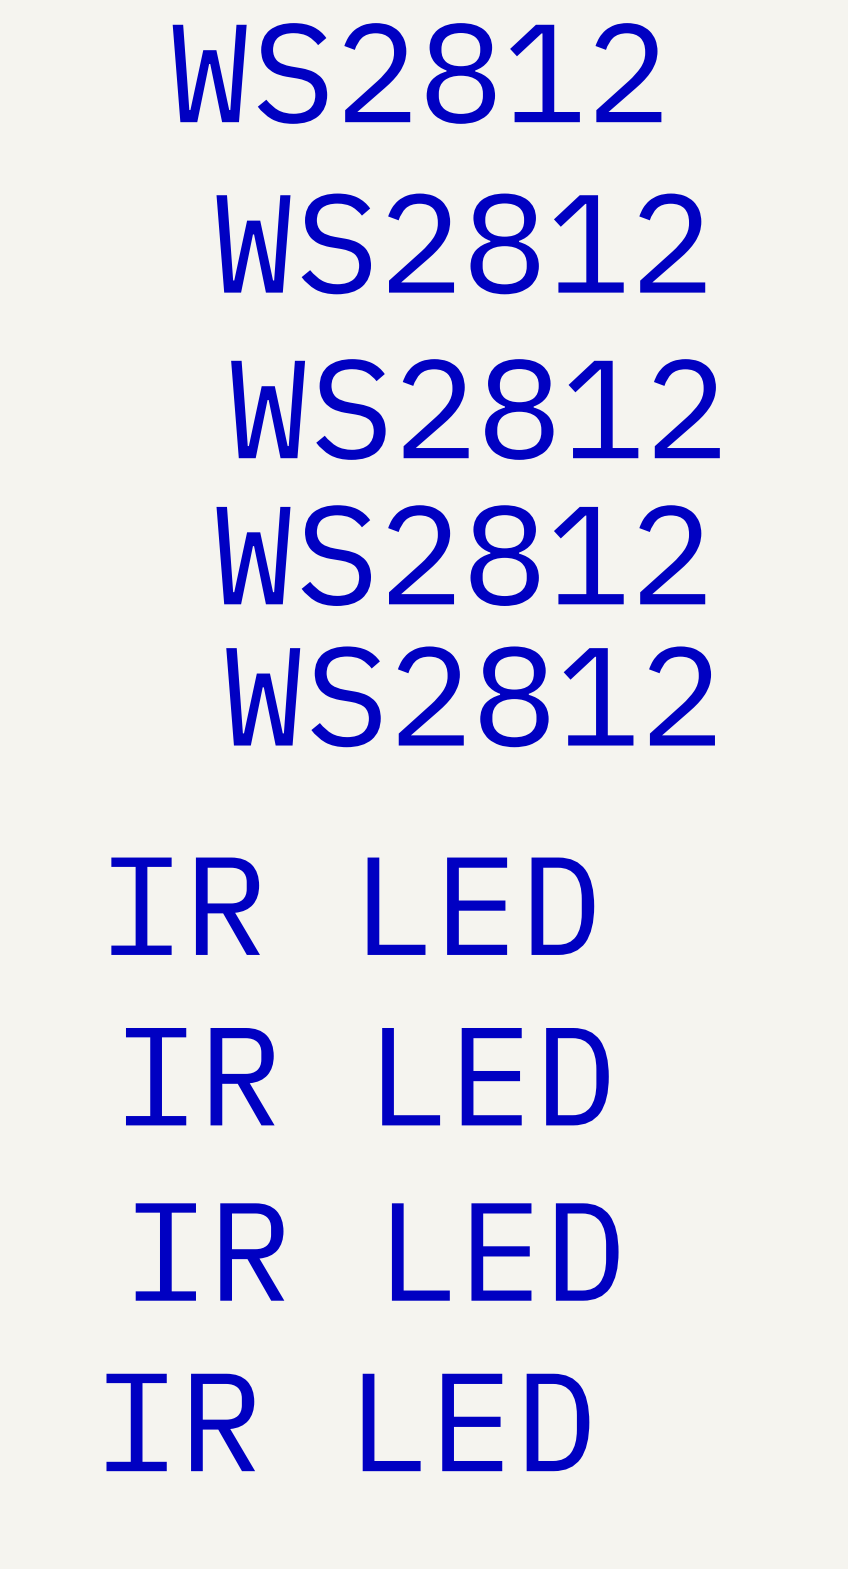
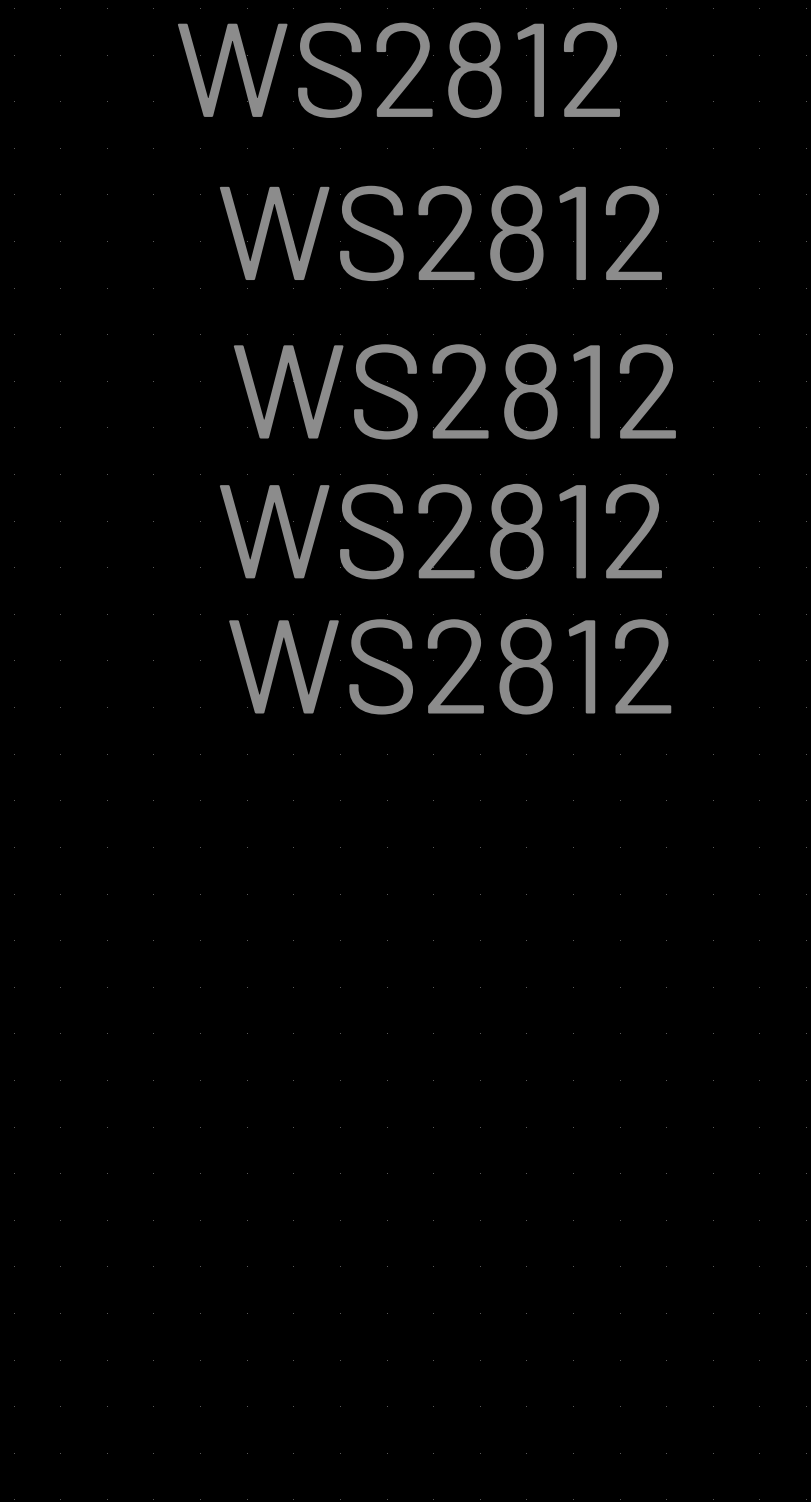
text: IR LED (352, 906) -> none
text: IR LED (367, 1076) -> none
text: IR LED (377, 1252) -> none
text: IR LED (347, 1422) -> none

